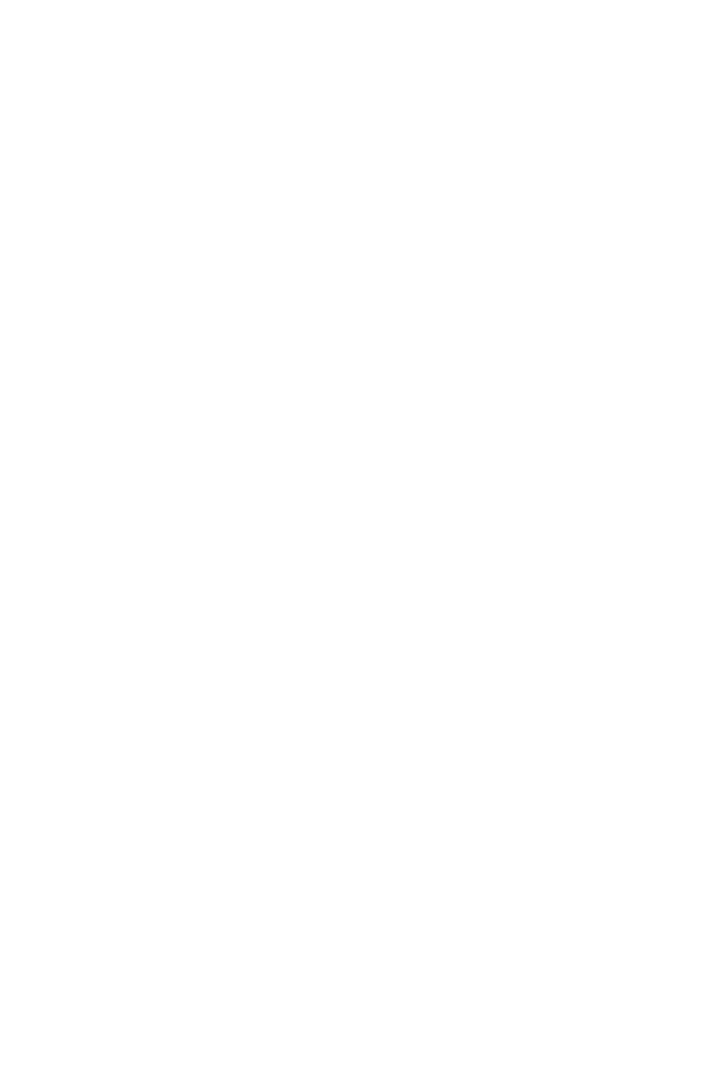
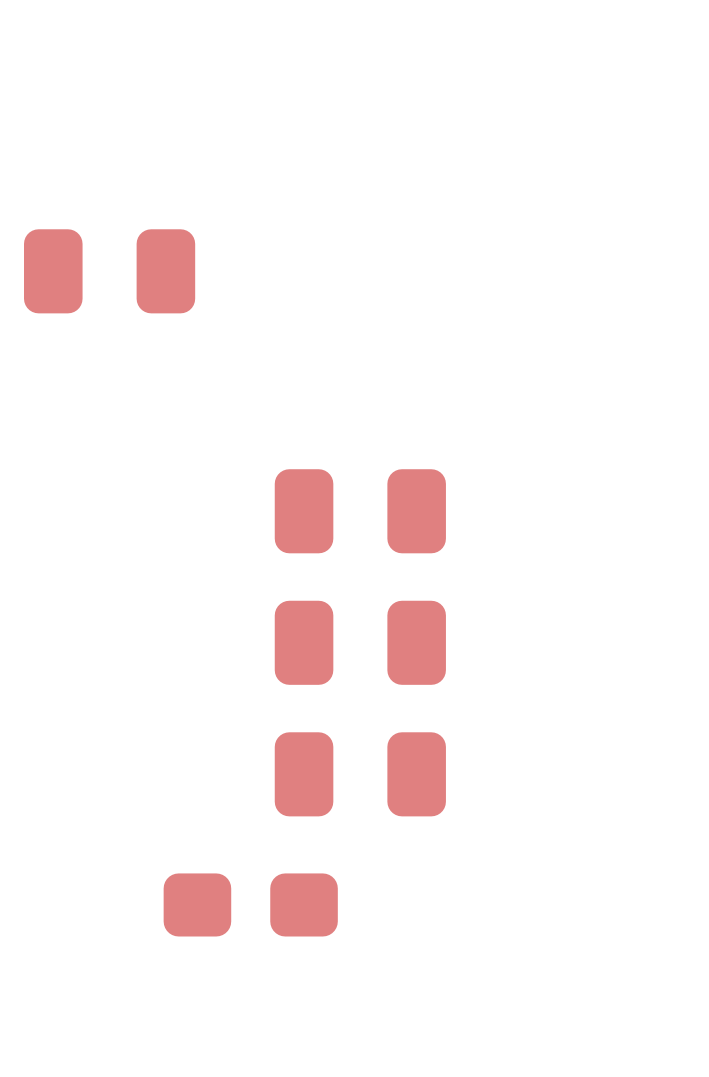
part: none -> (109, 271)
part: none -> (360, 511)
part: none -> (360, 642)
part: none -> (360, 774)
part: none -> (250, 904)

